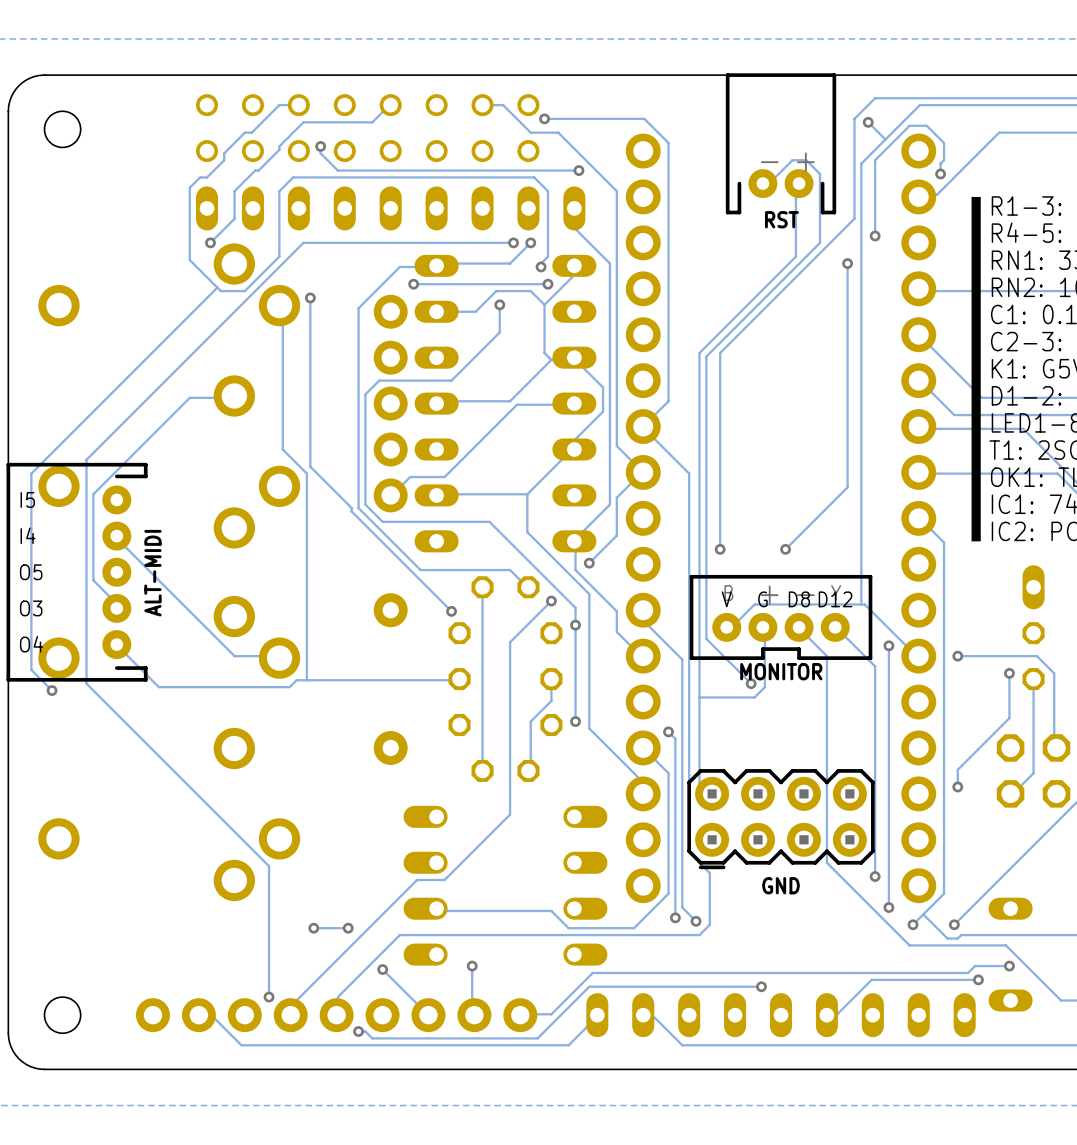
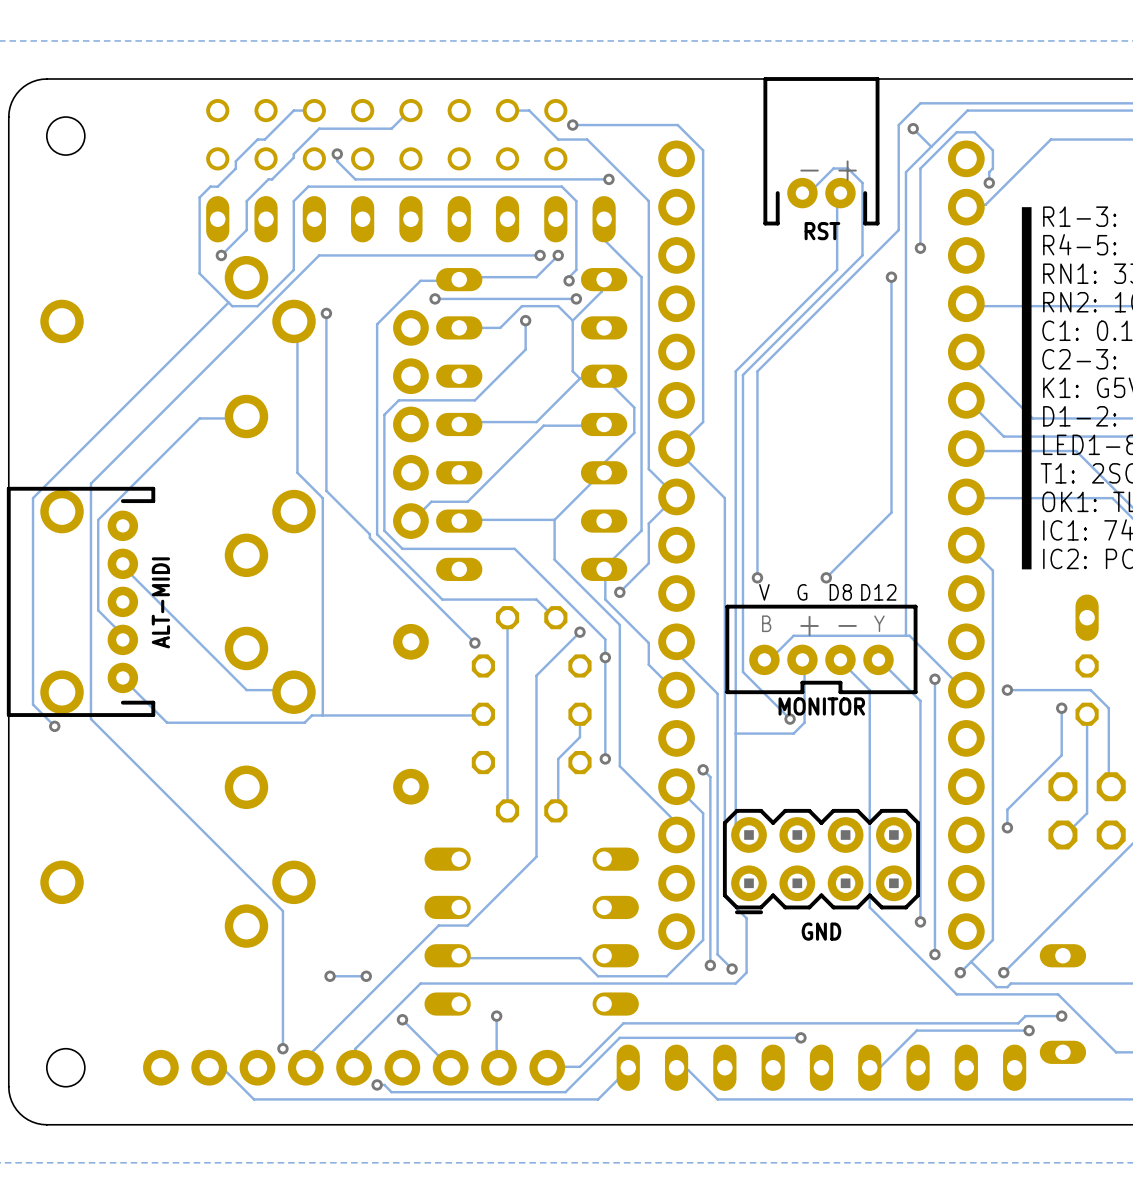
text: I5 (27, 499) -> none
text: I4 (28, 535) -> none
text: O5 (31, 572) -> none
text position: V (726, 599) -> V (764, 592)
text position: G (762, 599) -> G (802, 592)
text position: D8 (799, 599) -> D8 (840, 592)
text position: D12 (835, 599) -> D12 (878, 592)
text: O3 (31, 608) -> none
text: O4 (31, 644) -> none

